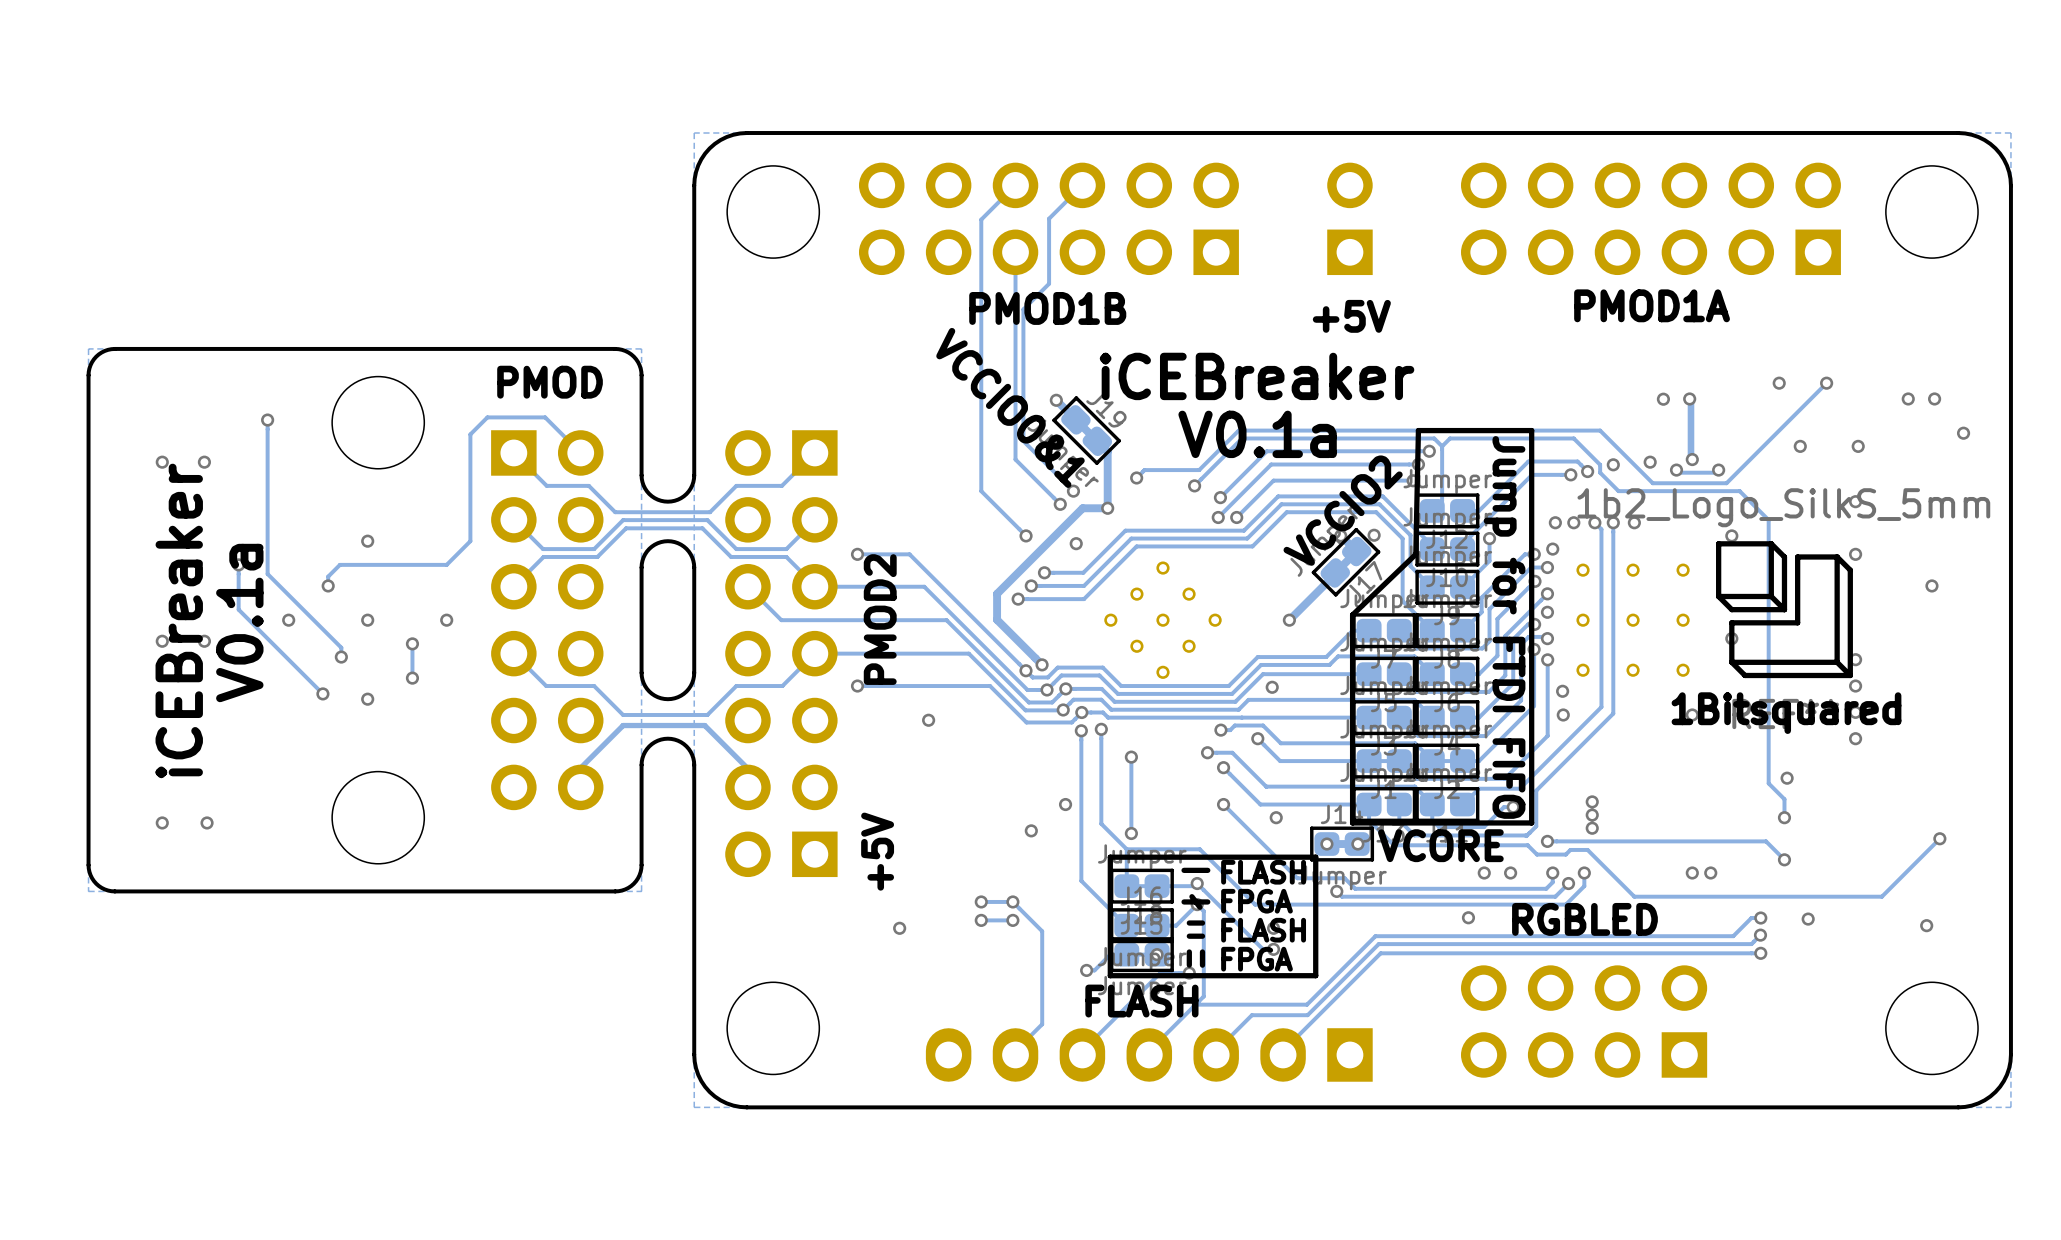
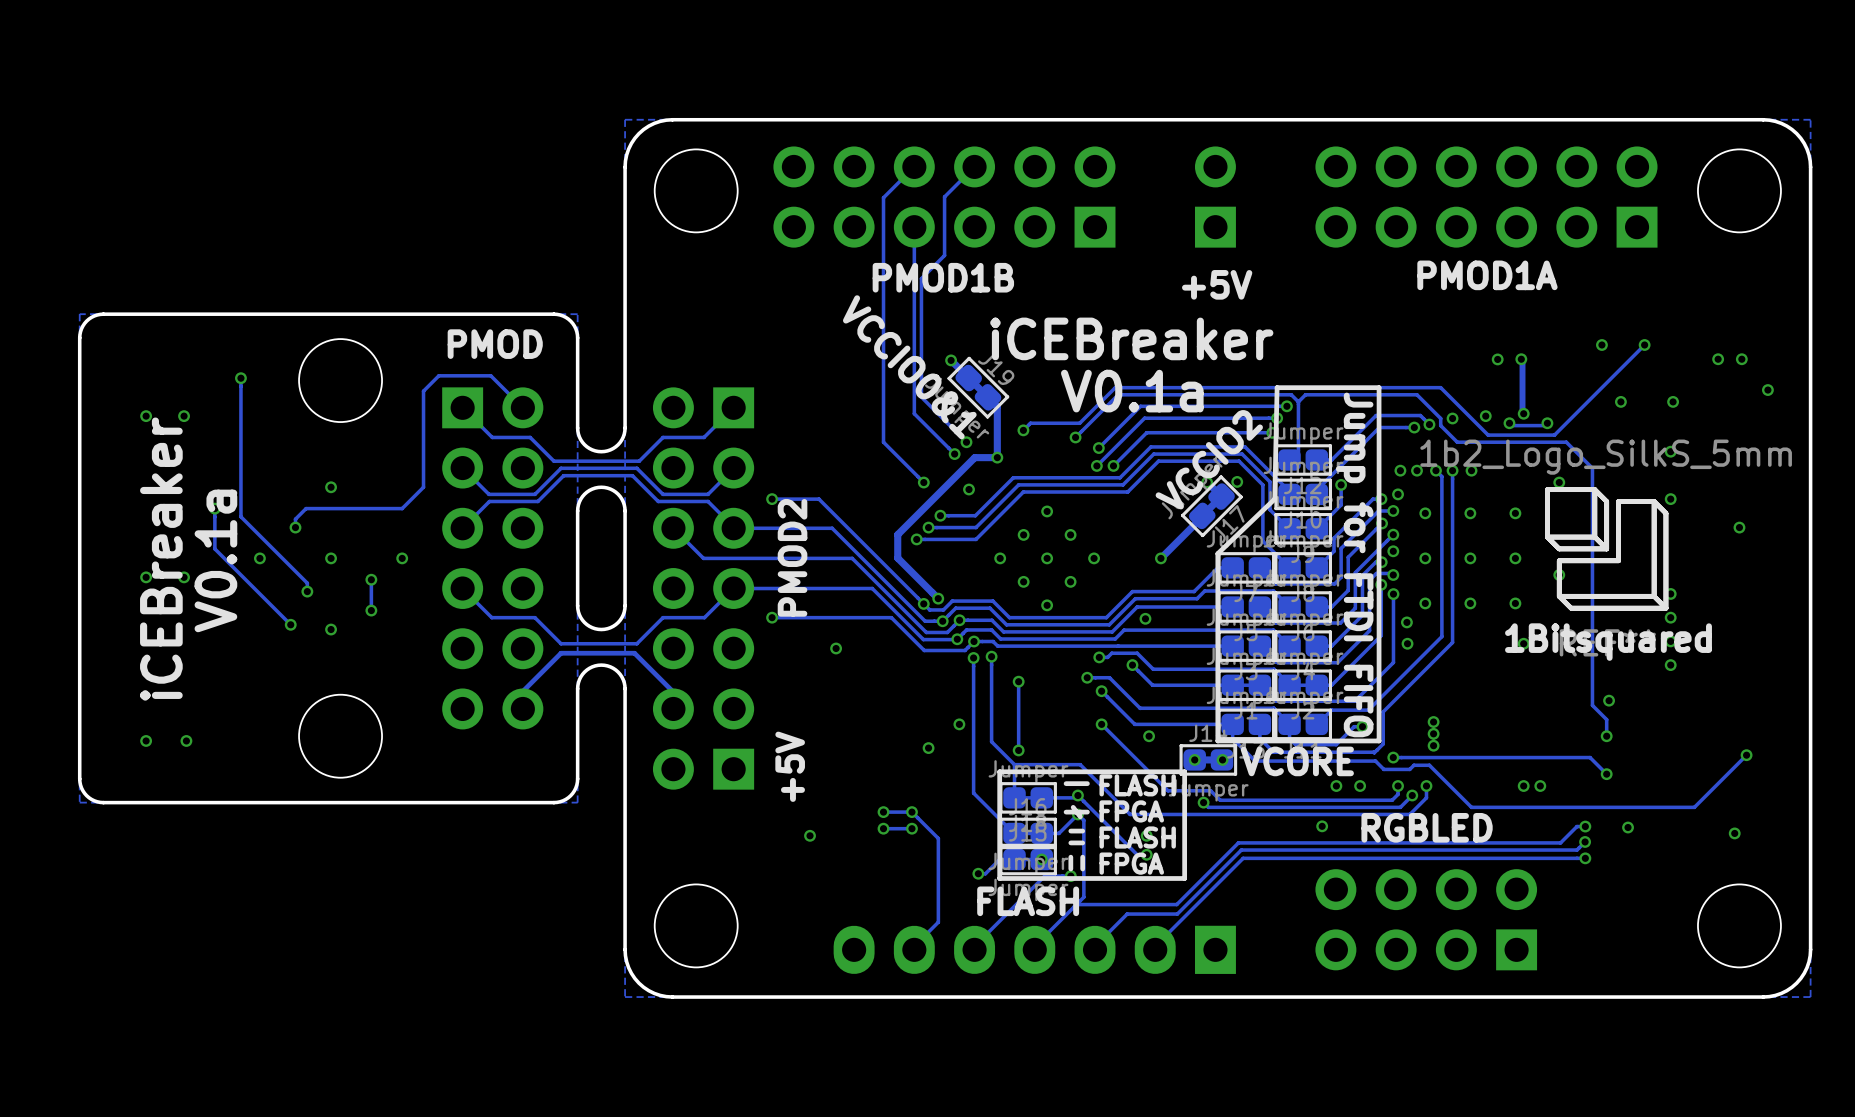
drawing: none -> [1545, 487, 1669, 611]

